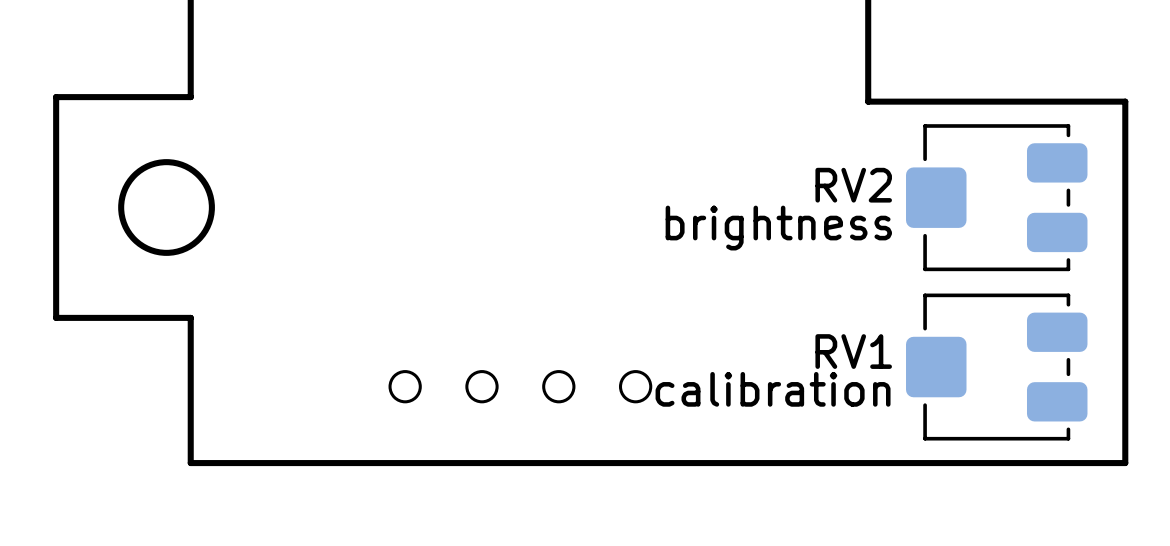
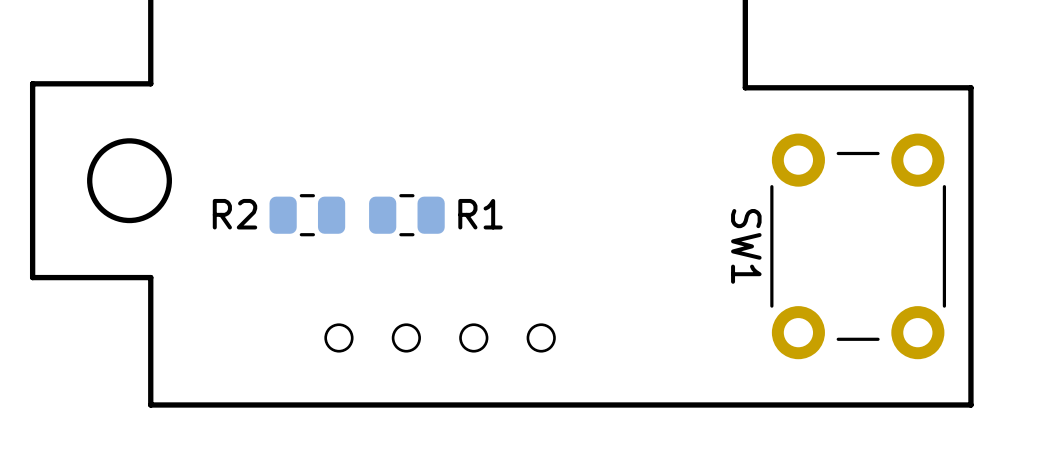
RV2: (996, 197) -> none
text: brightness (778, 228) -> none
R2: none -> (307, 215)
R1: none -> (406, 215)
SW1: none -> (858, 246)
RV1: (996, 367) -> none
text: calibration (773, 389) -> none

